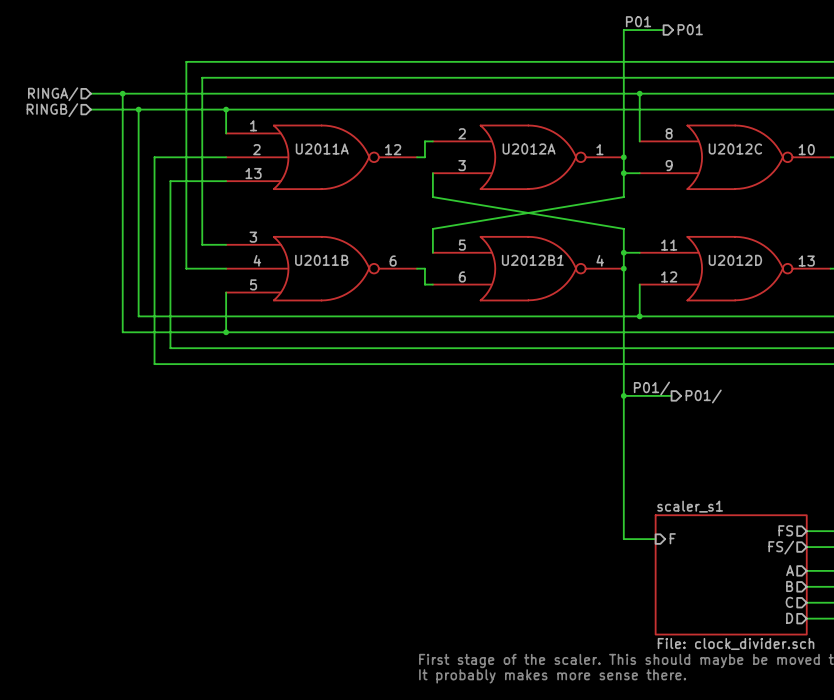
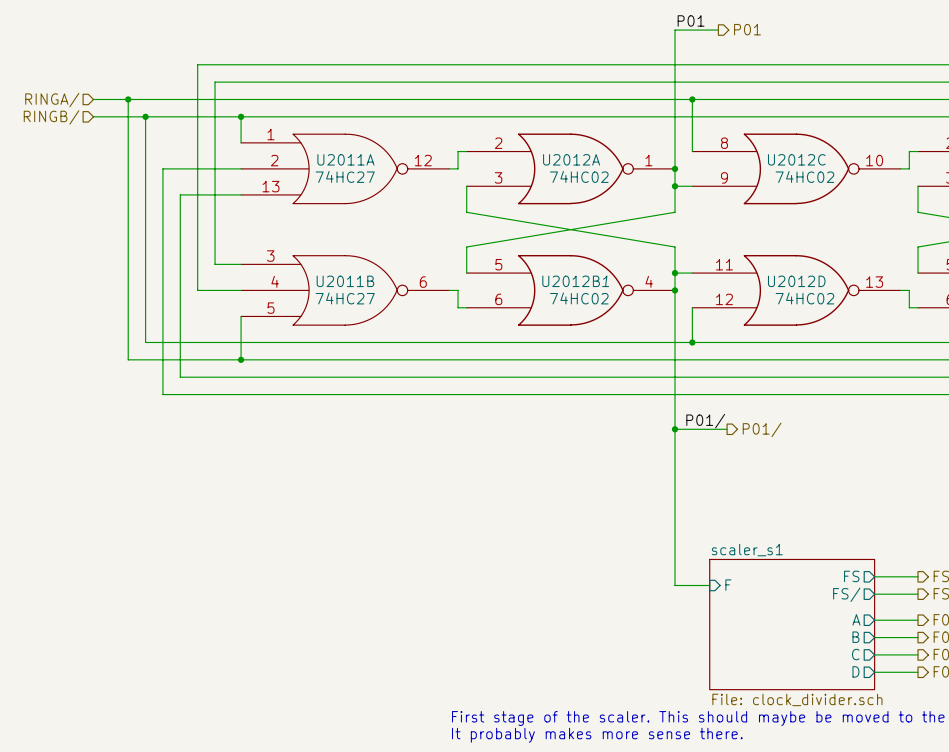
U2011A value: none -> 74HC27 (345, 176)
U2012A value: none -> 74HC02 (579, 176)
U2012C value: none -> 74HC02 (804, 176)
U2011B value: none -> 74HC27 (345, 298)
U2012B value: none -> 74HC02 (579, 298)
U2012D value: none -> 74HC02 (804, 298)

